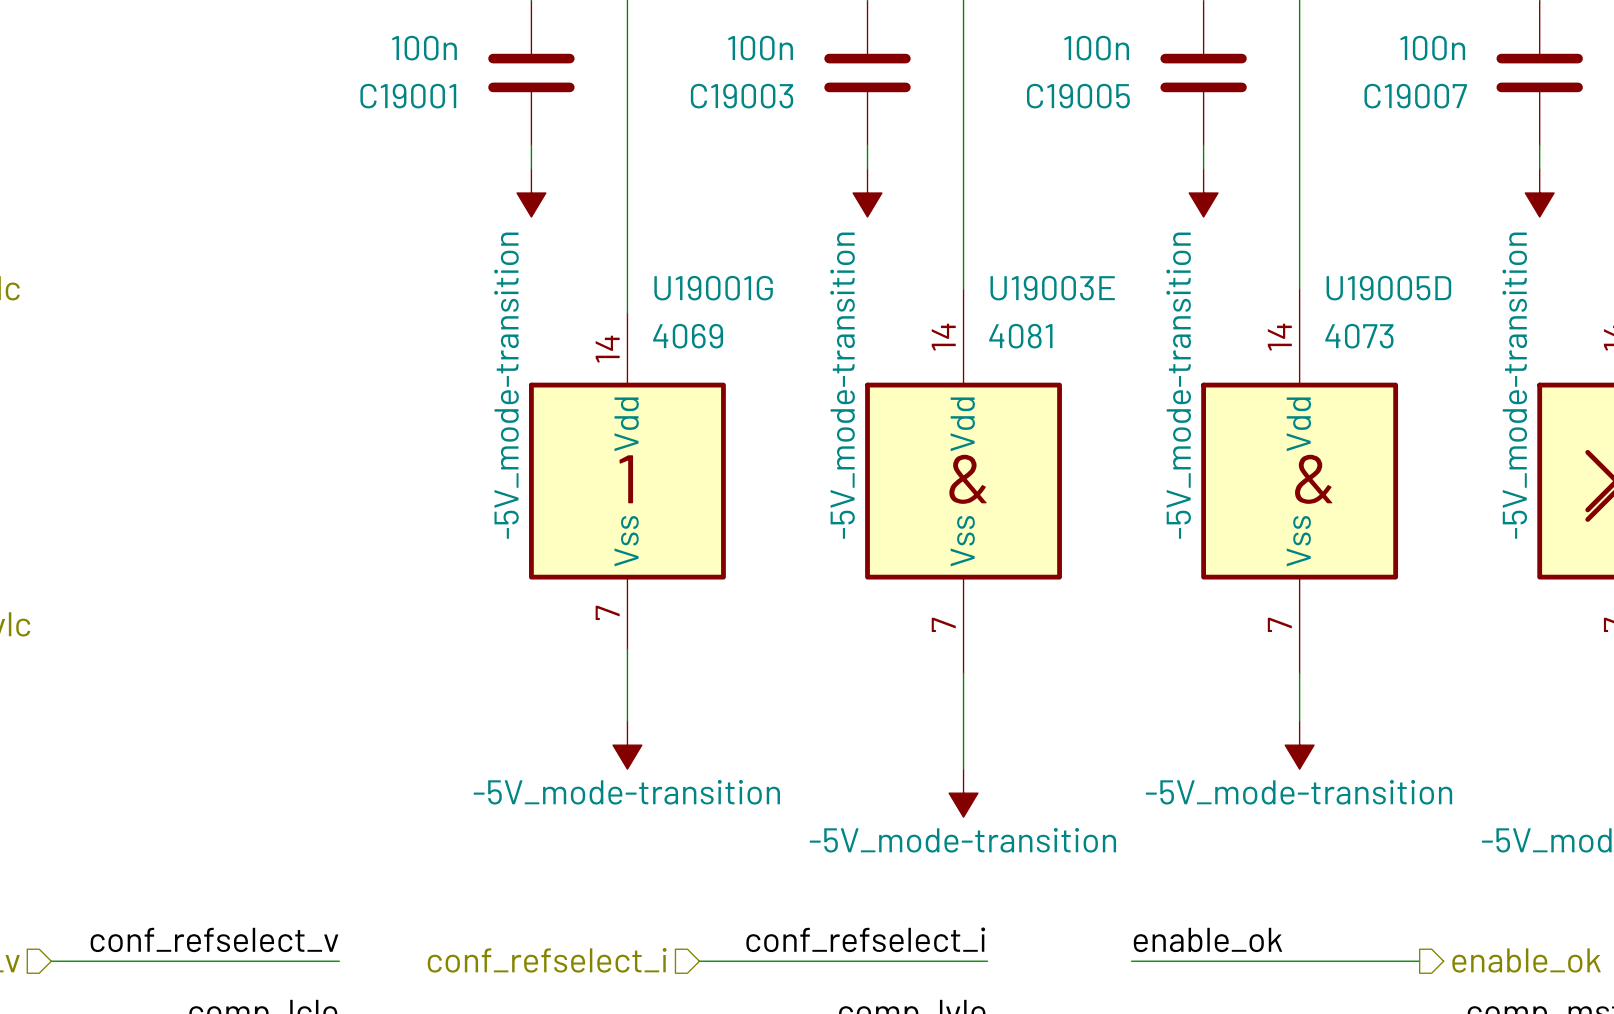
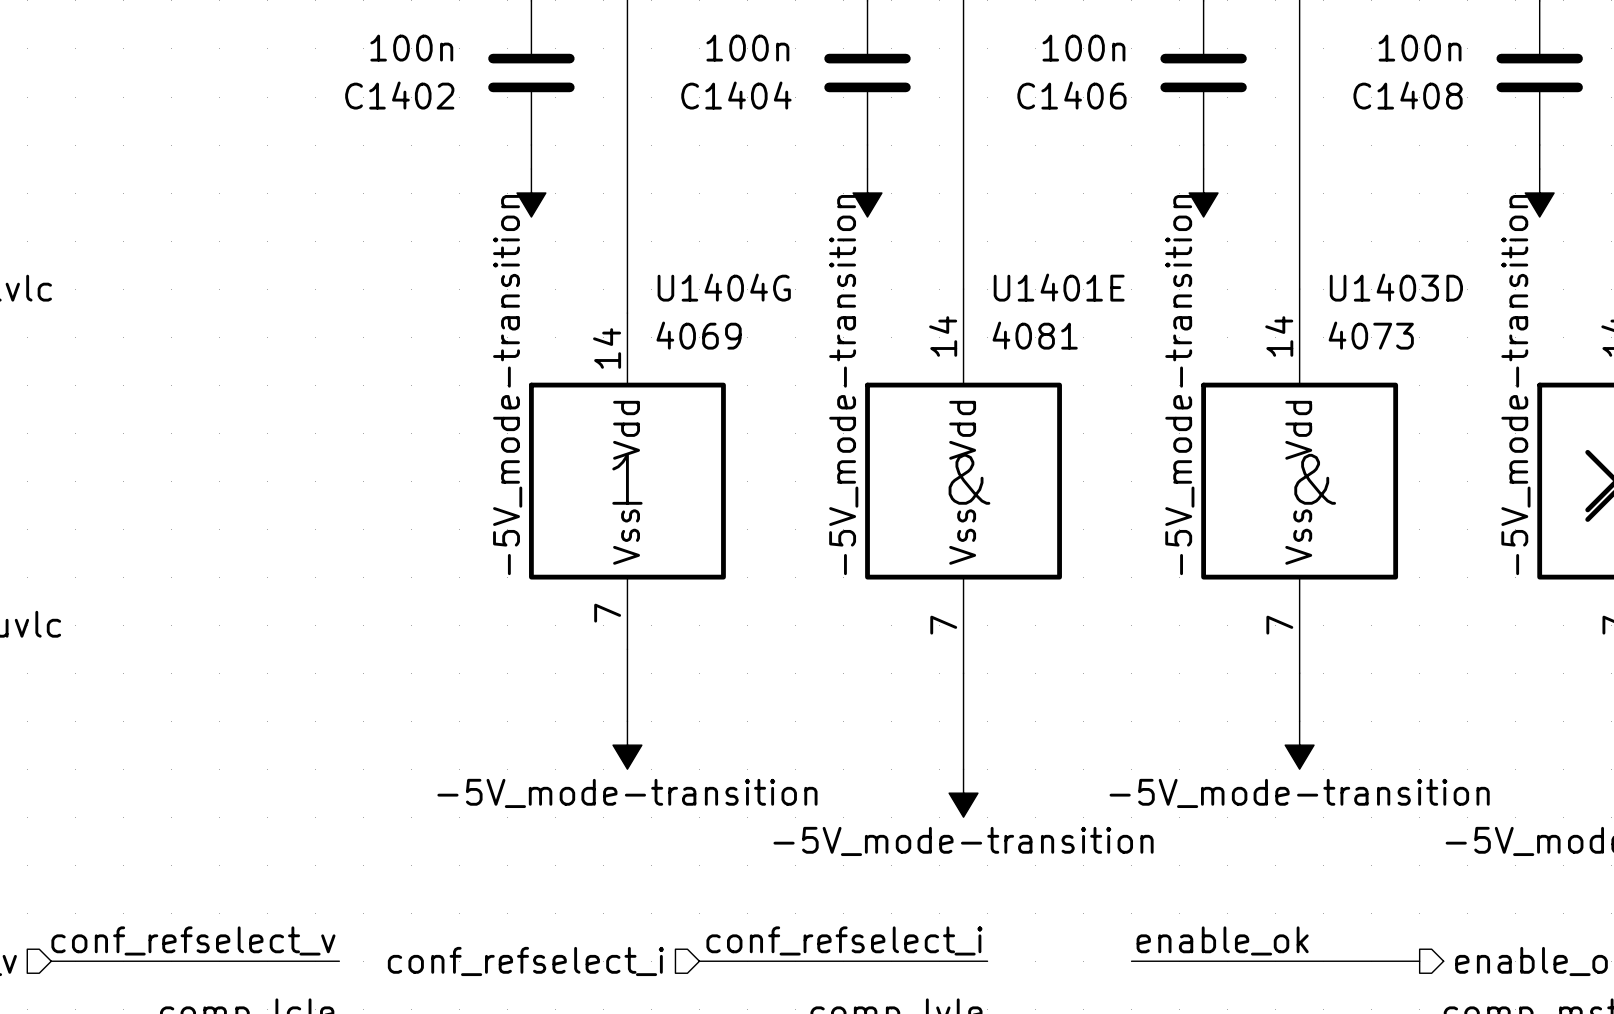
C19001 name: C19001 (408, 96) -> C1402 (399, 95)
C19003 name: C19003 (742, 96) -> C1404 (736, 95)
C19005 name: C19005 (1078, 96) -> C1406 (1071, 95)
C19007 name: C19007 (1415, 96) -> C1408 (1408, 95)
U19001G name: U19001G (713, 288) -> U1404G (724, 287)
U19003E name: U19003E (1052, 288) -> U1401E (1059, 287)
U19005D name: U19005D (1388, 288) -> U1403D (1396, 287)

